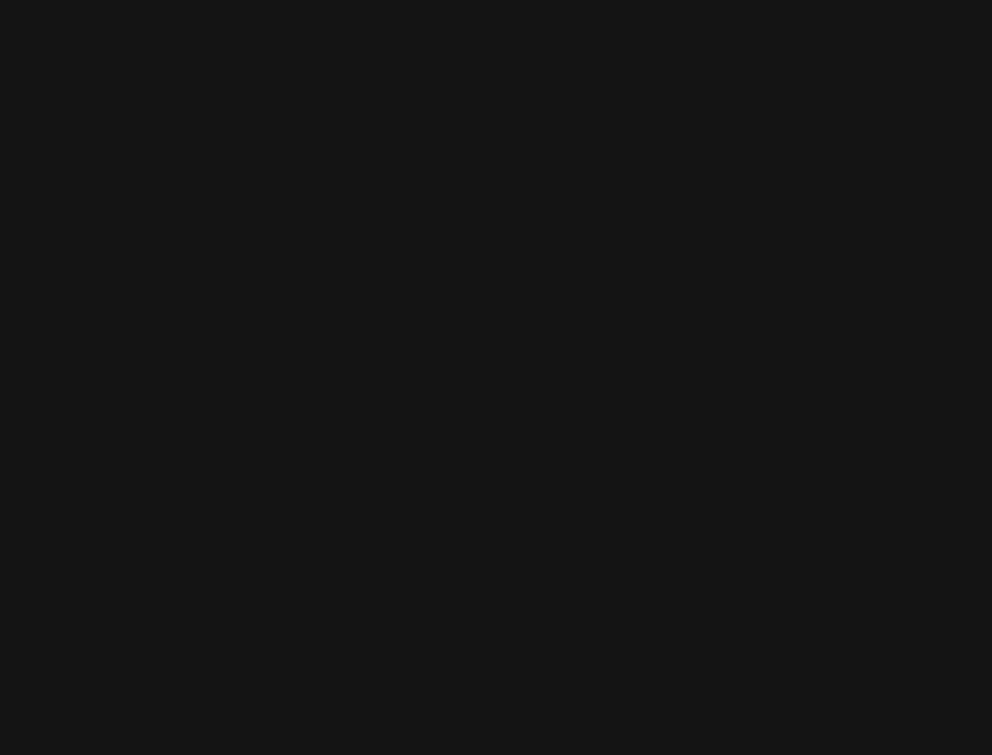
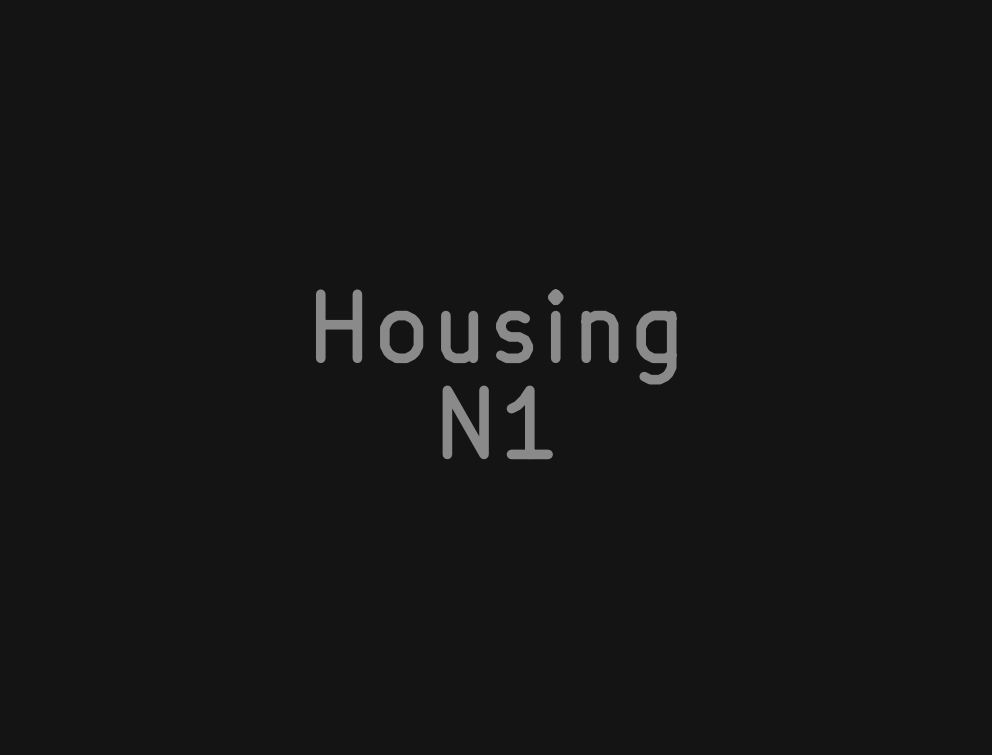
N1: none -> Housing (496, 374)

